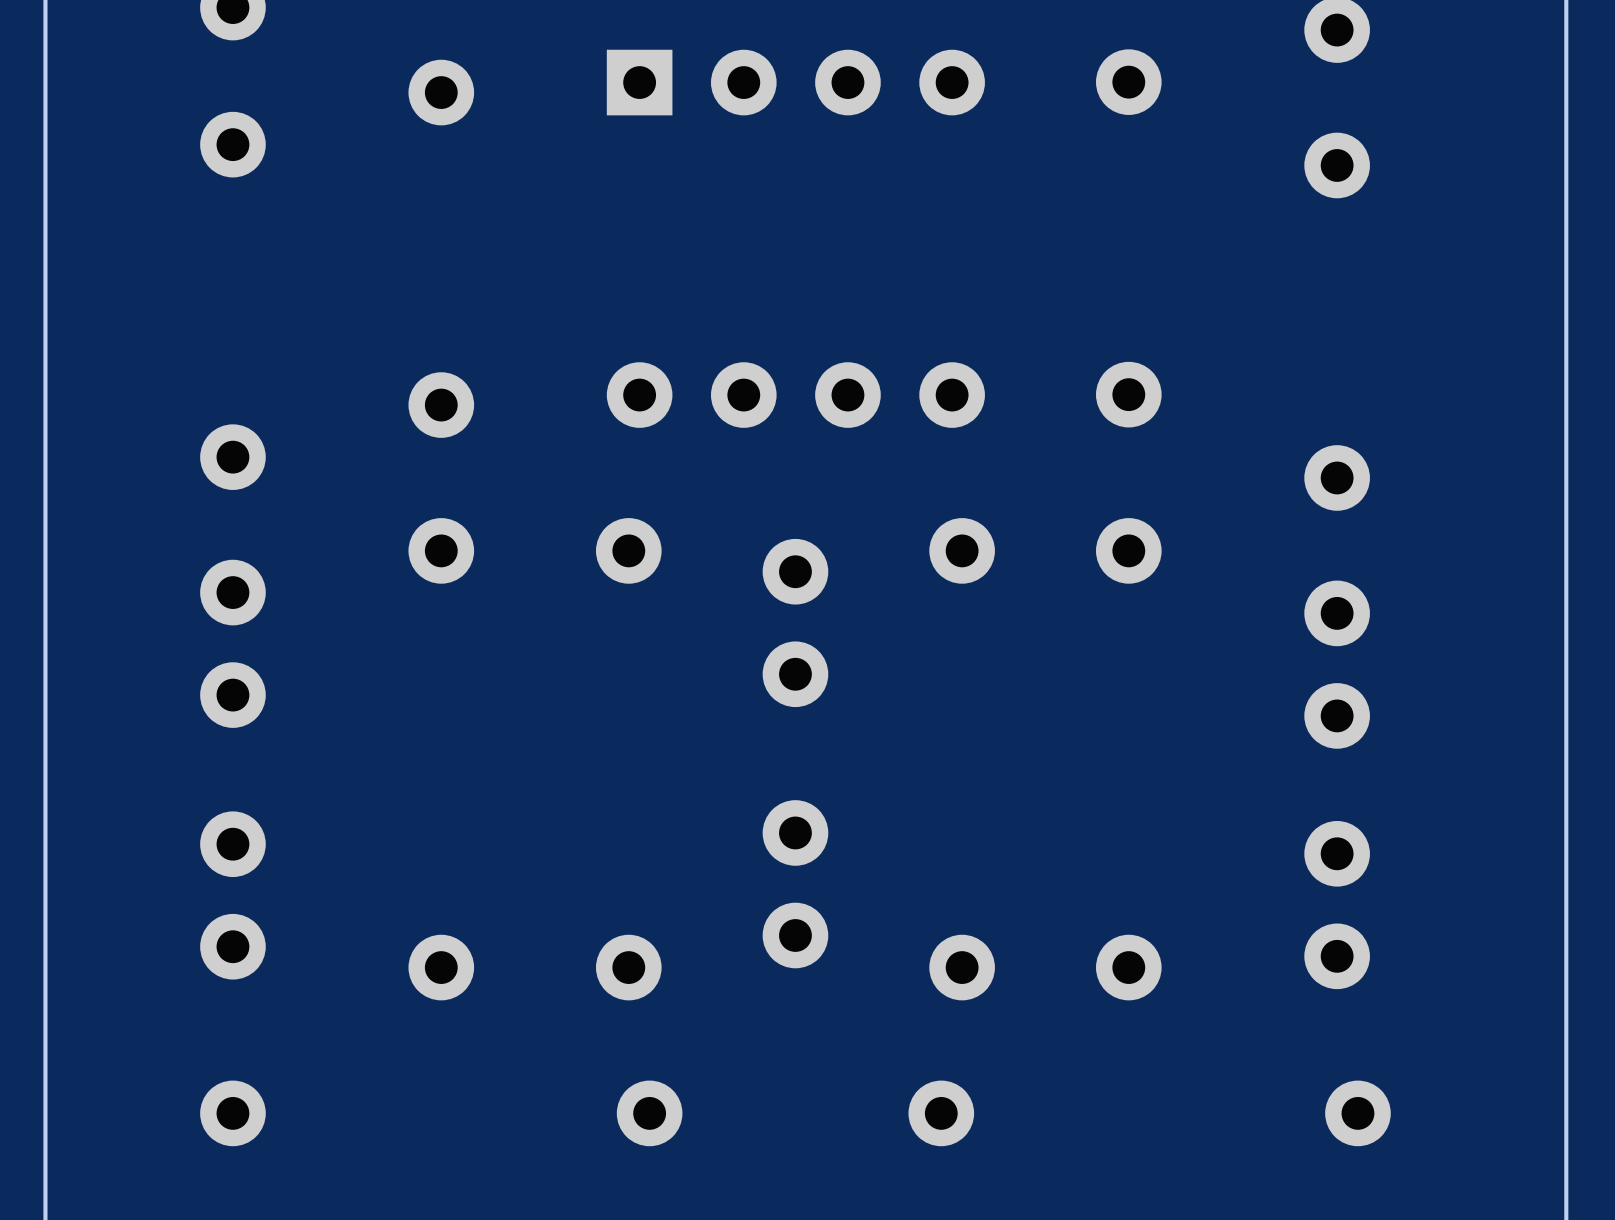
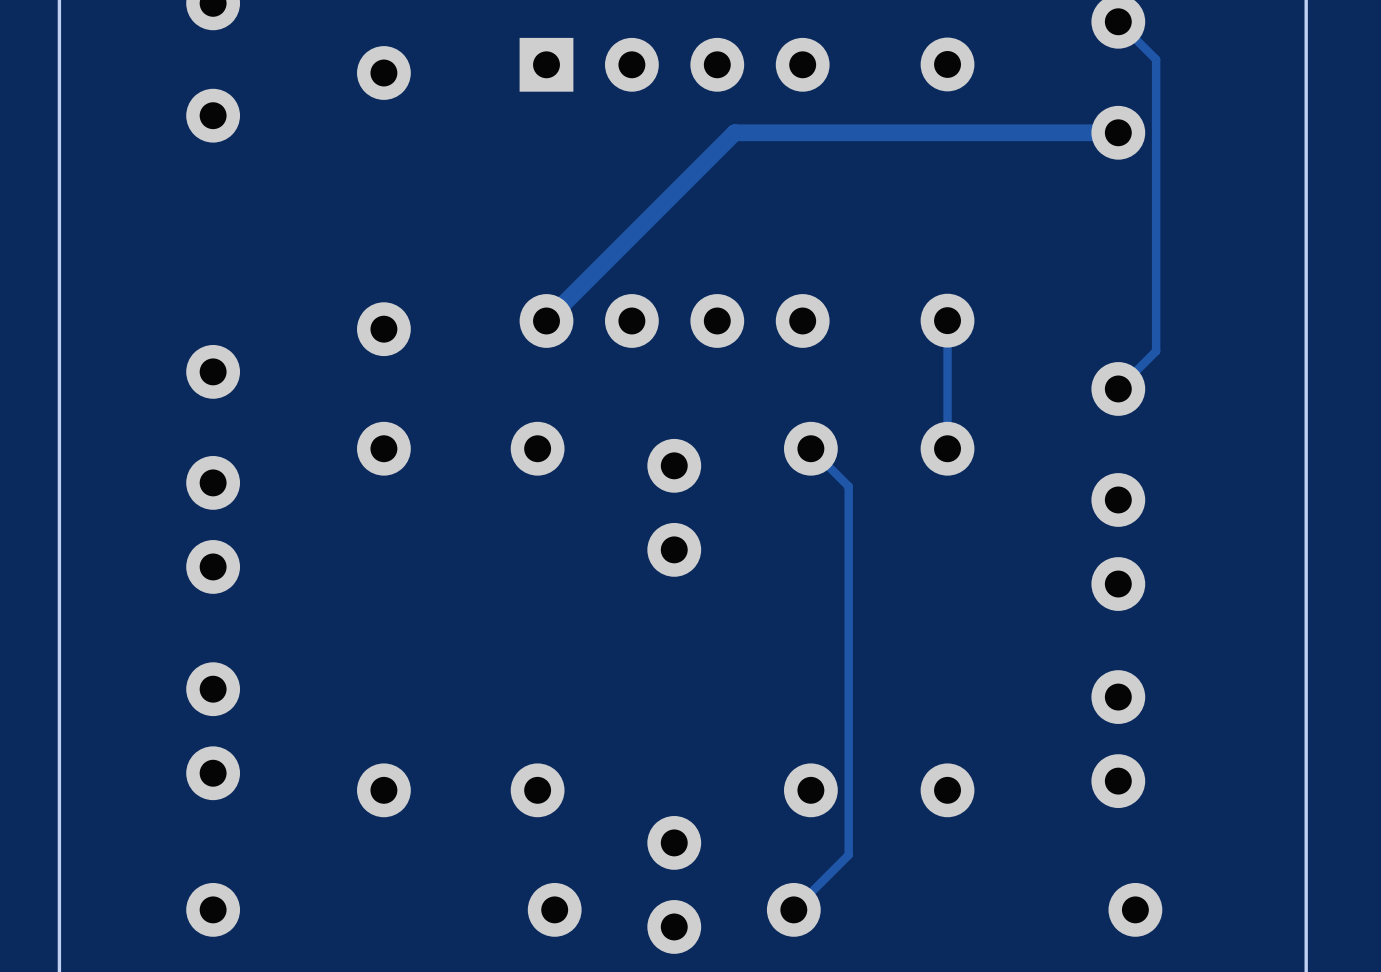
track: none -> (1118, 21) (1156, 59) (1156, 351) (1118, 388)
track: none -> (1118, 132) (734, 132) (546, 320)
track: none -> (947, 320) (947, 448)
track: none -> (810, 448) (848, 486) (848, 854) (793, 909)
part position: (795, 884) -> (674, 884)

